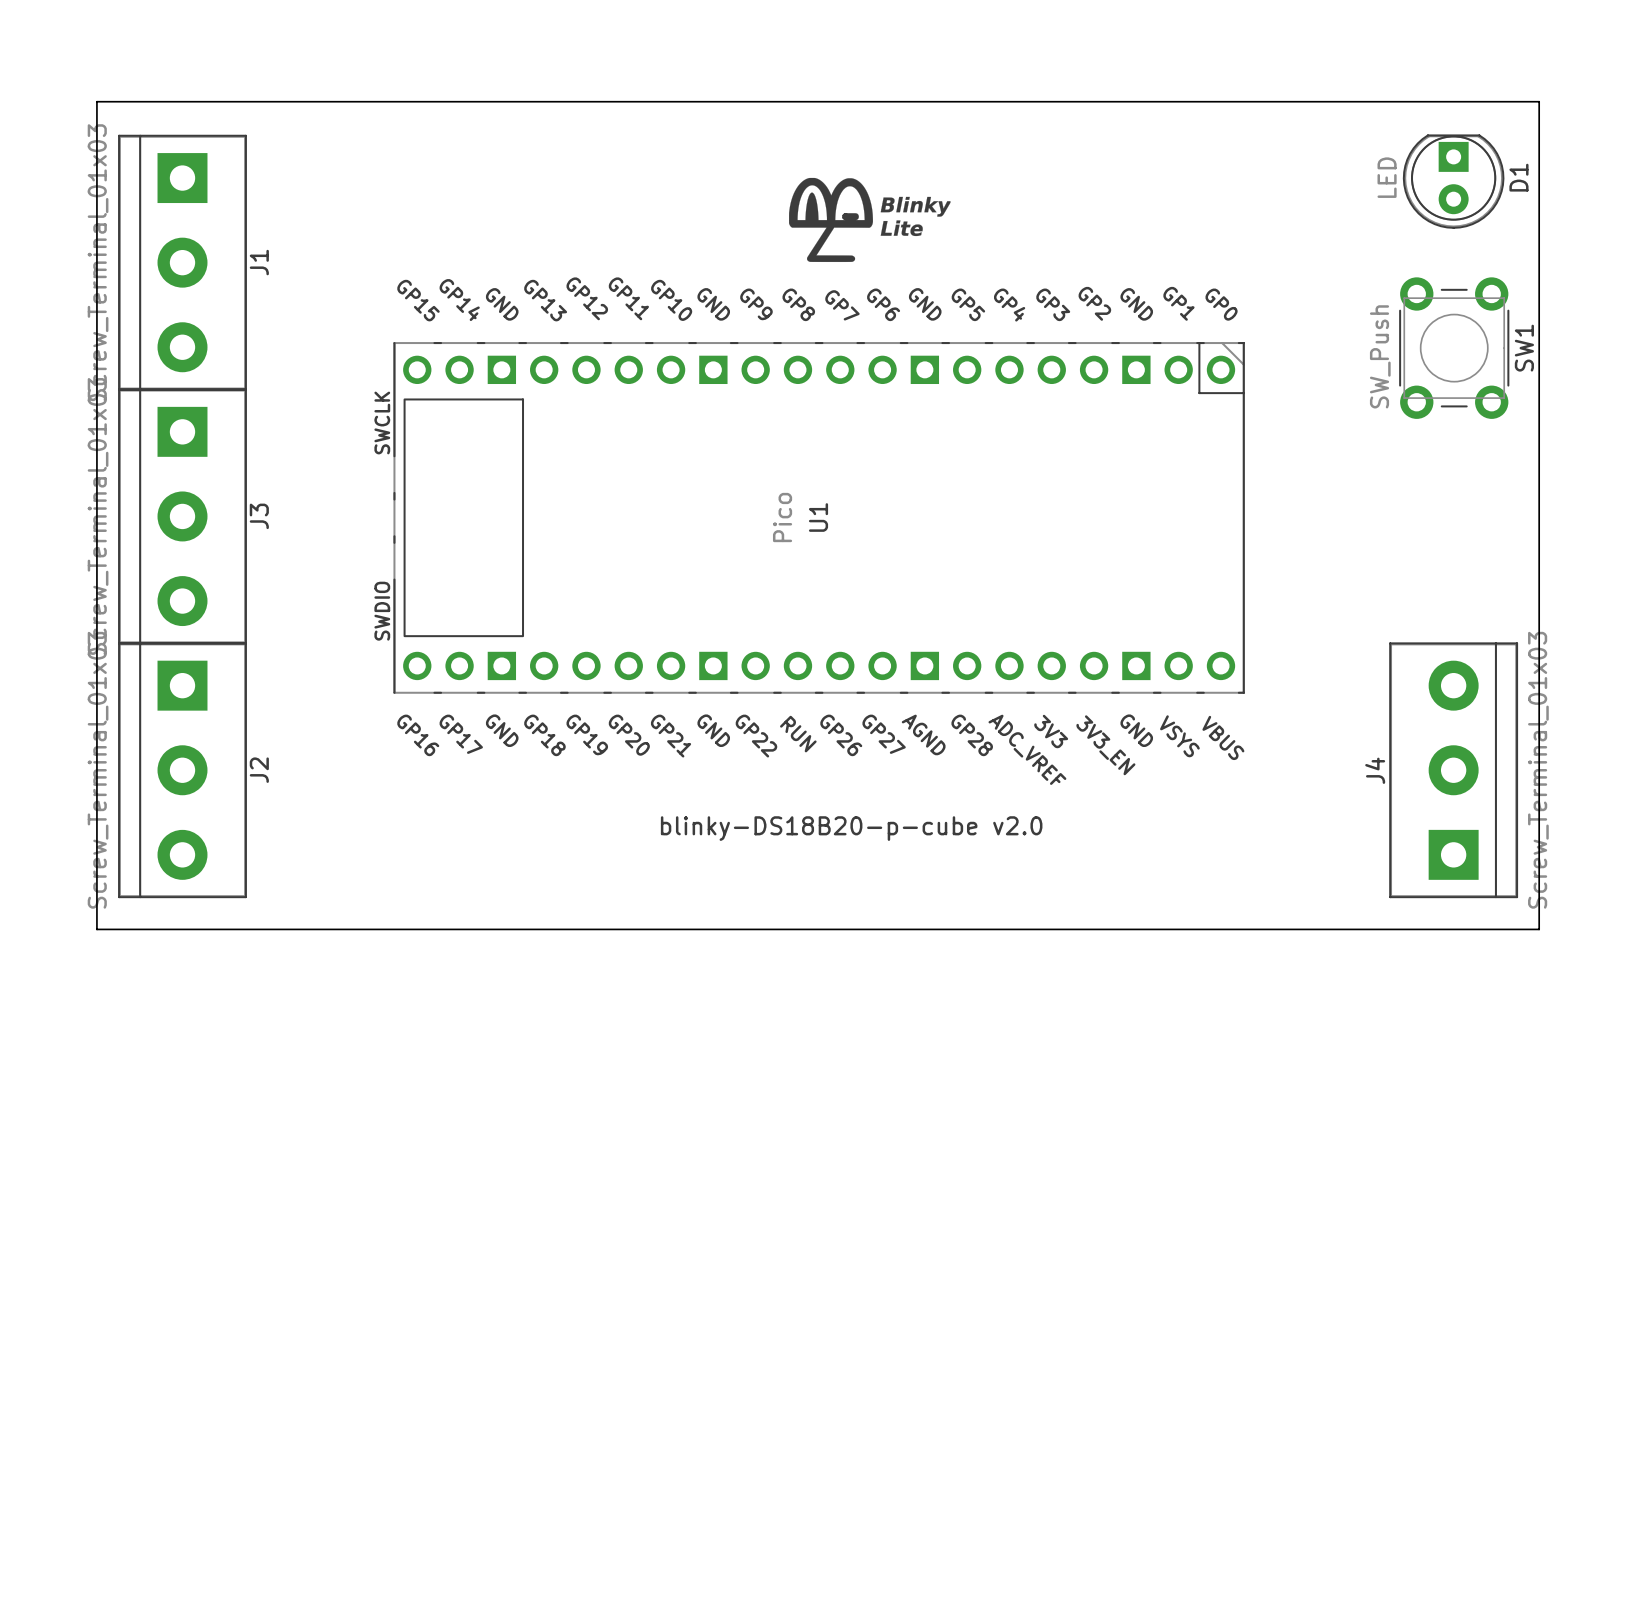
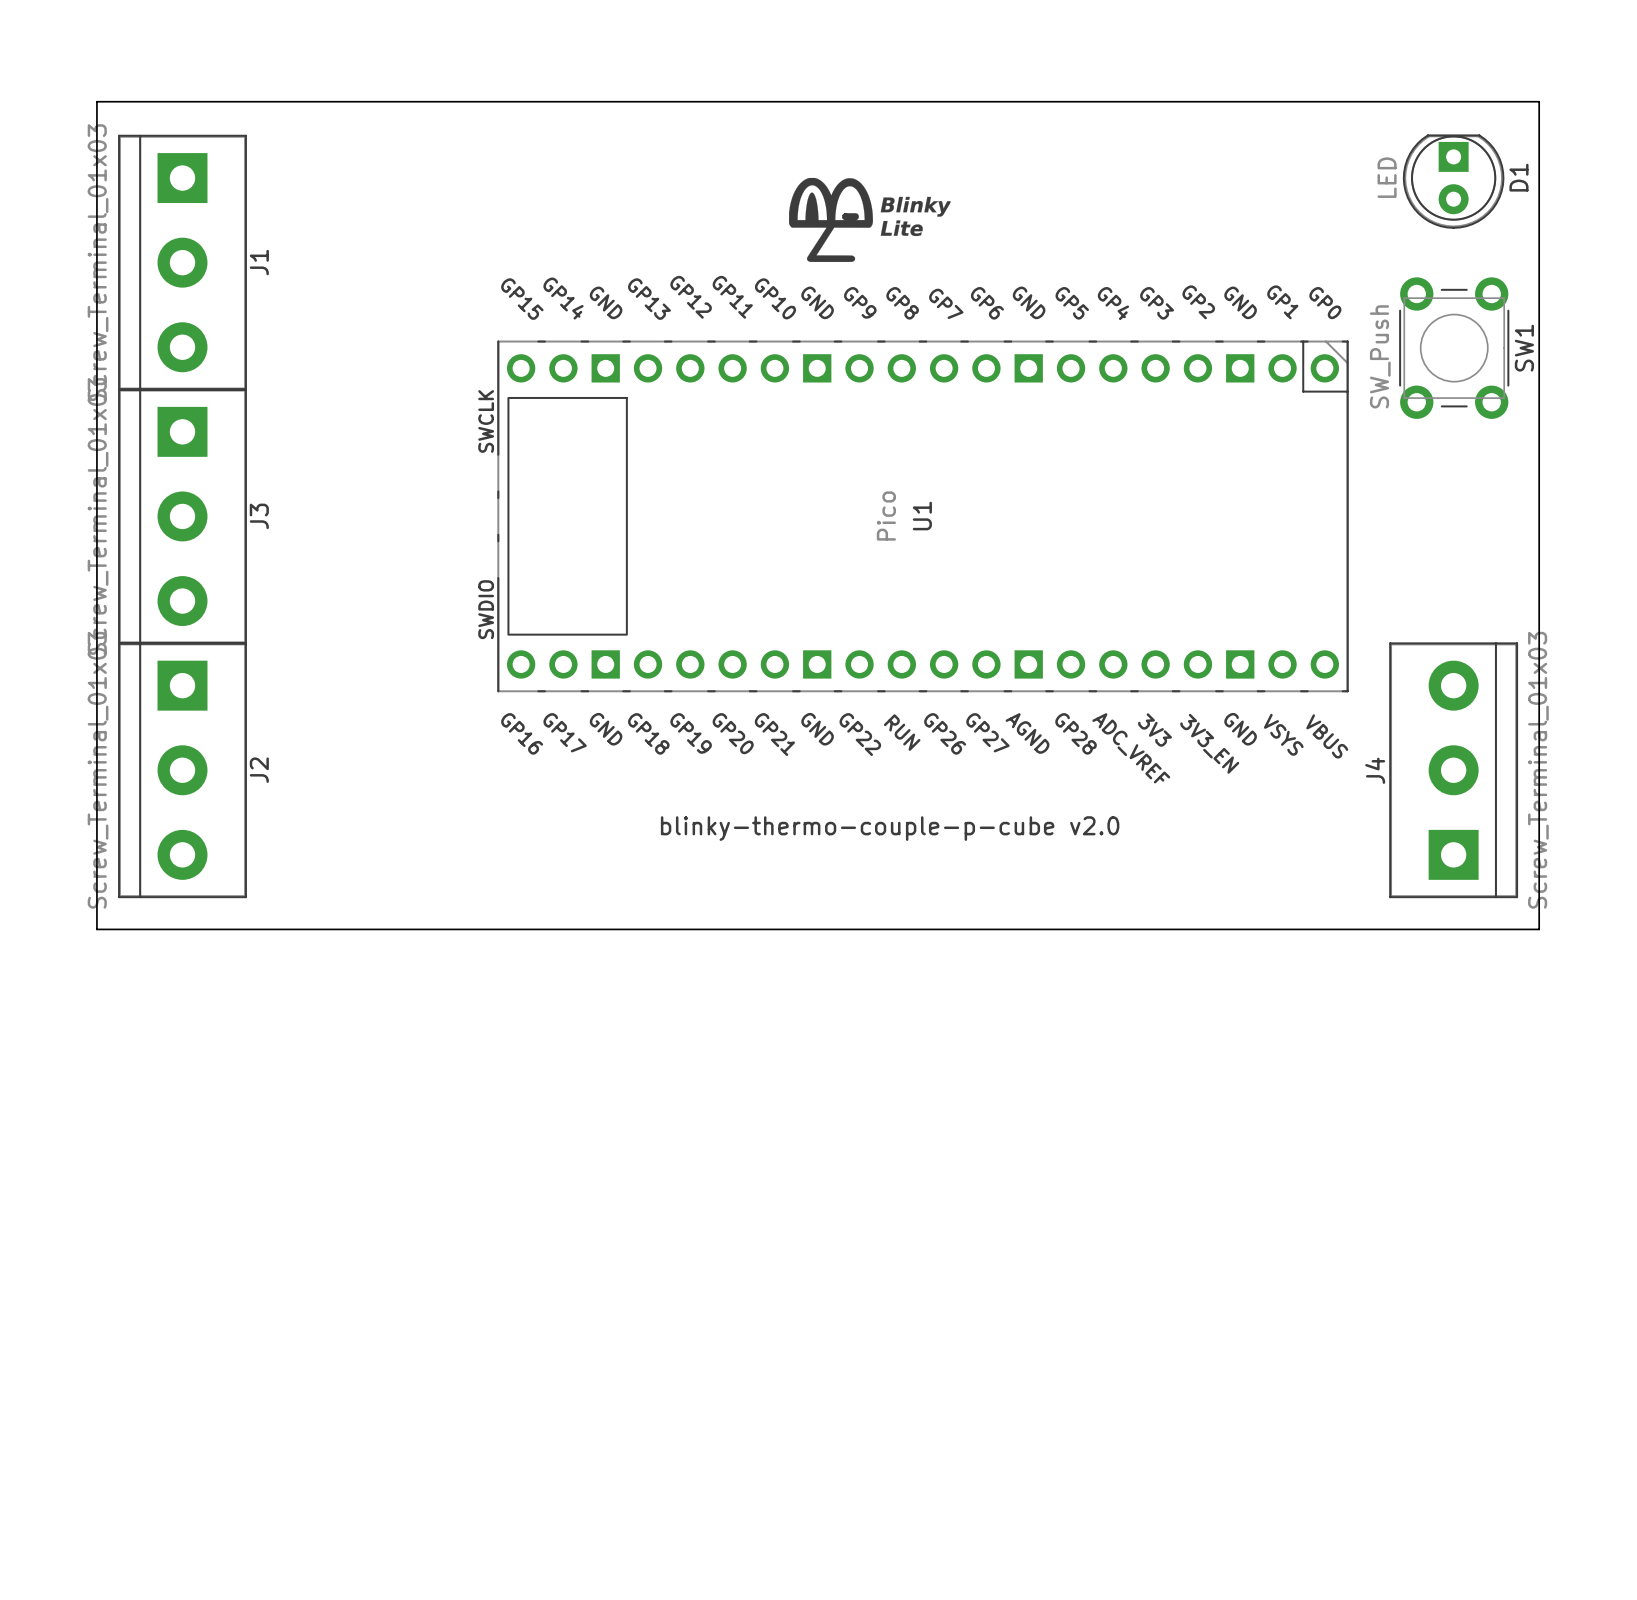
U1 position: (819, 517) -> (922, 516)
text: blinky-DS18B20-p-cube v2.0 (851, 828) -> blinky-thermo-couple-p-cube v2.0 (890, 828)

